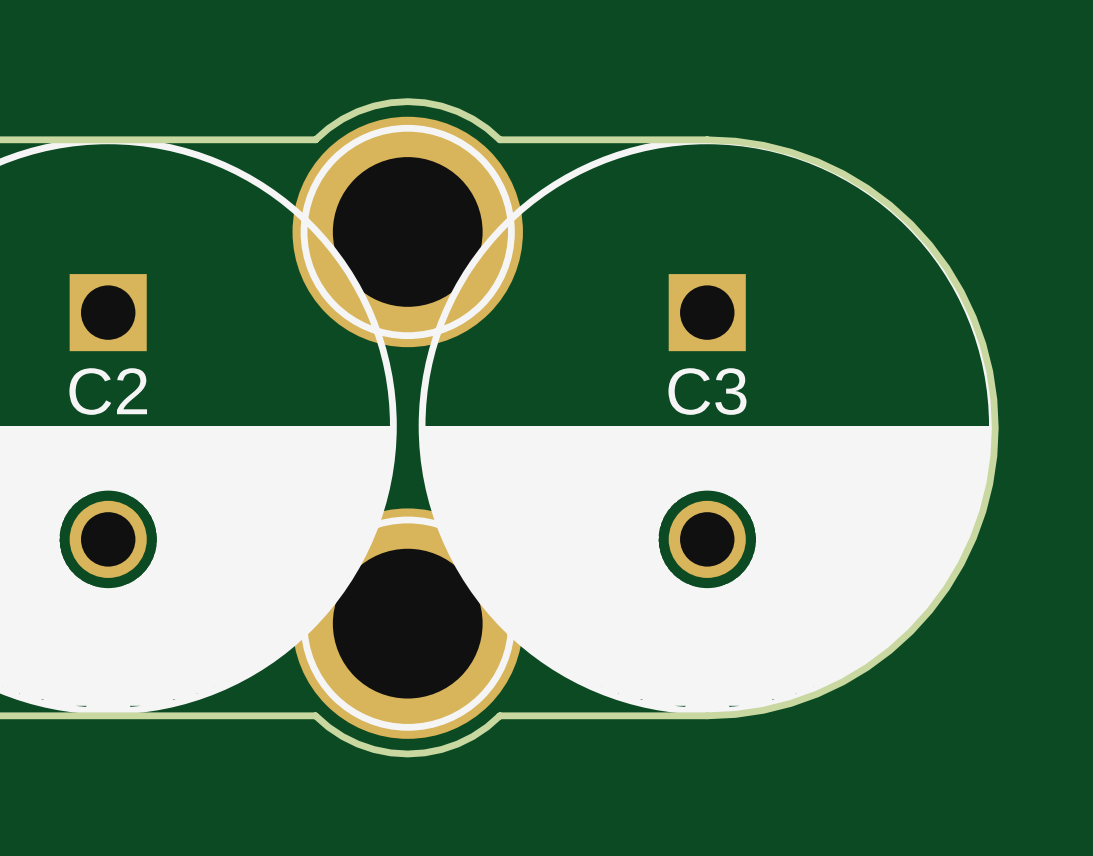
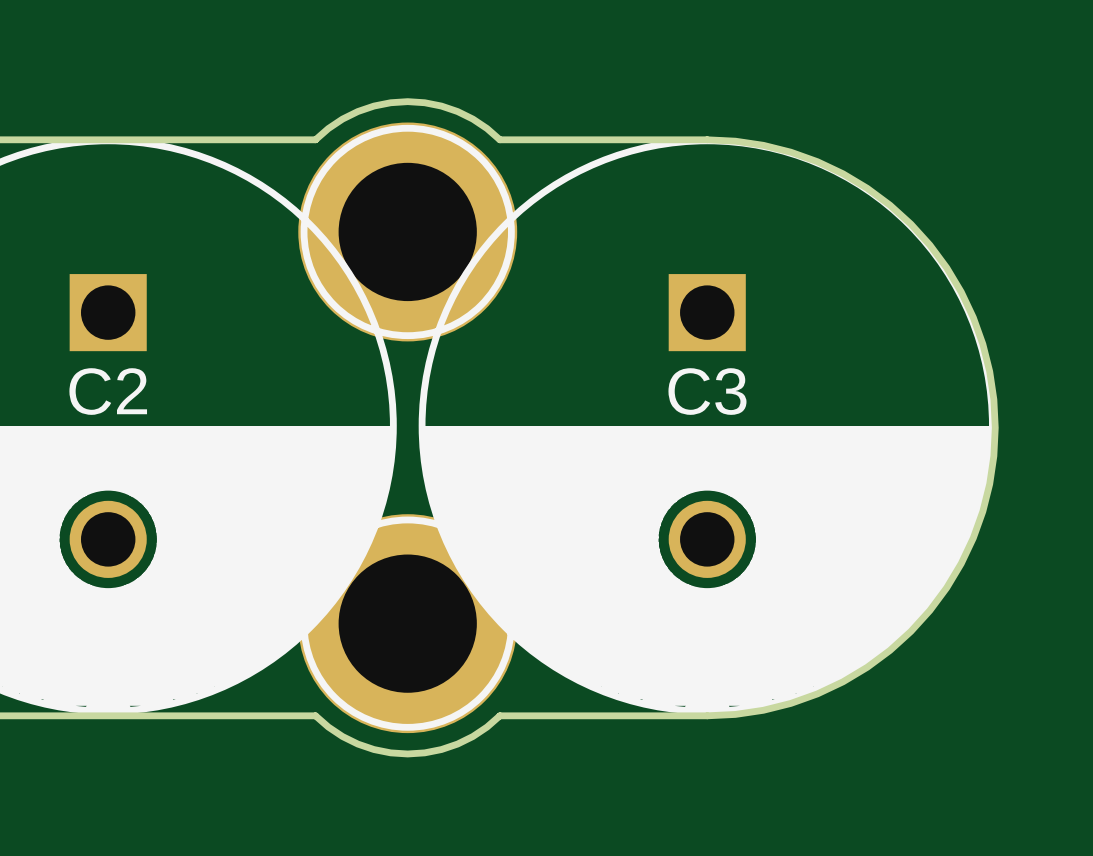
part footprint: [292, 116, 523, 348] -> [298, 122, 518, 342]
part footprint: [292, 508, 523, 739] -> [298, 514, 518, 734]

